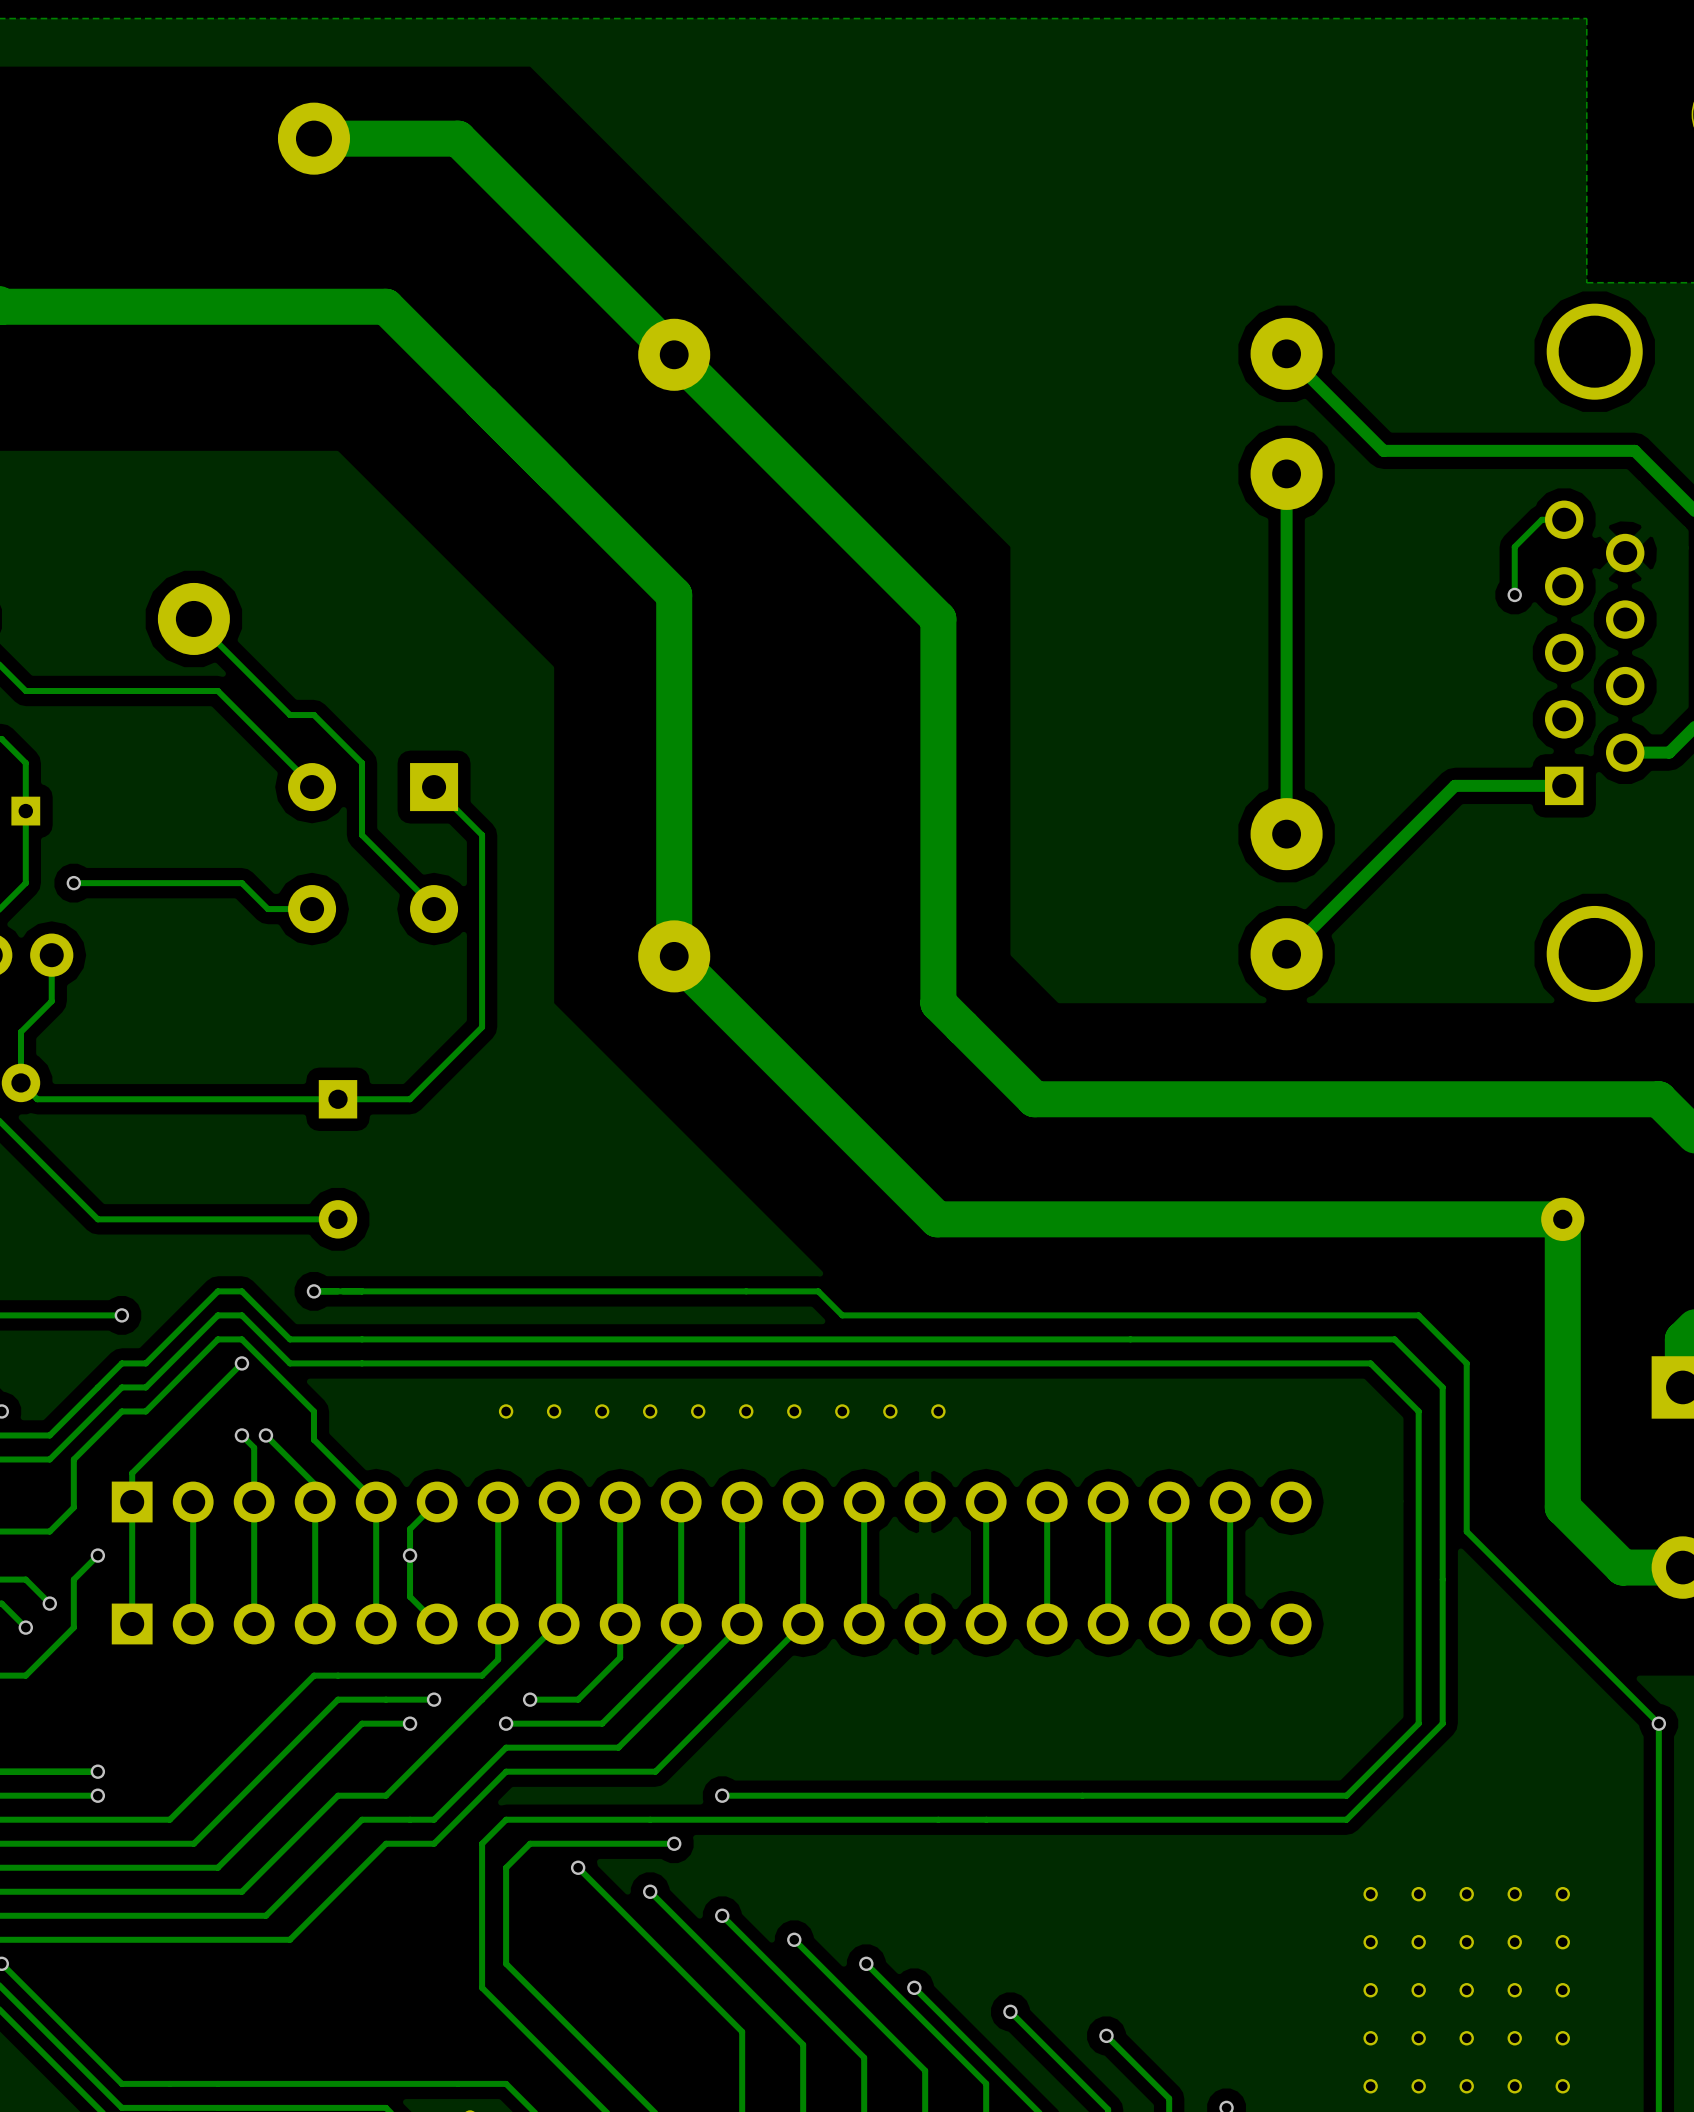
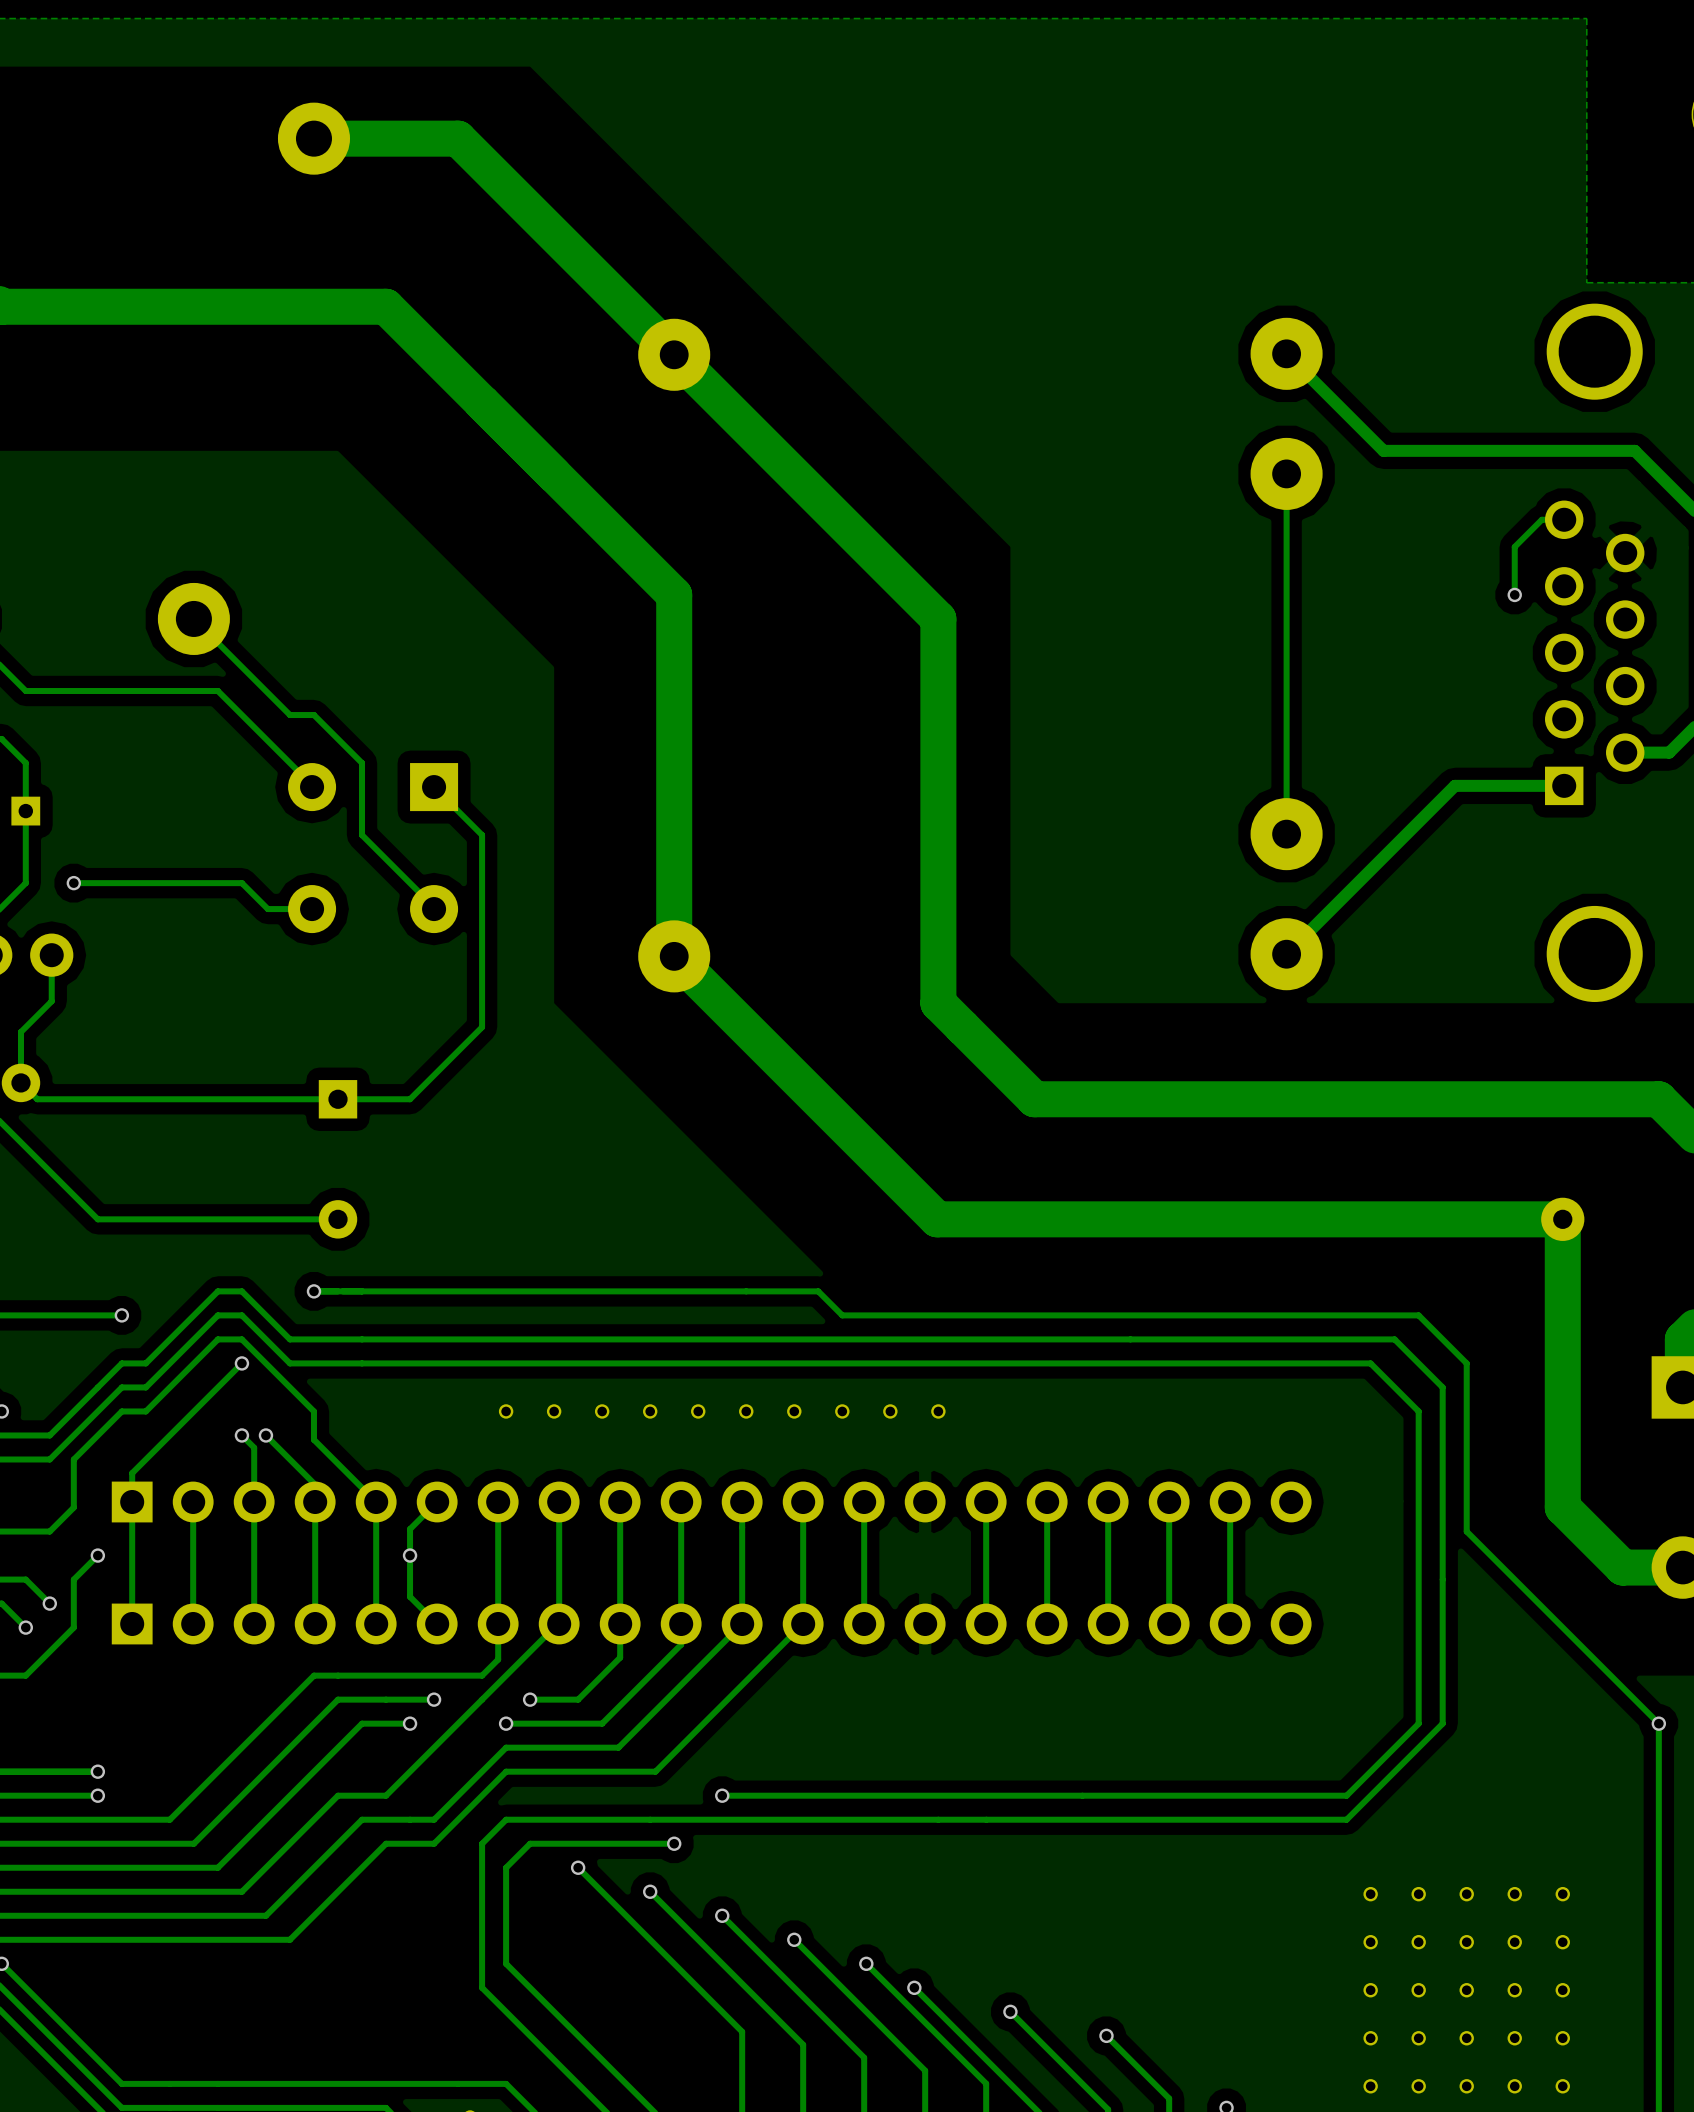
track width: thick (1286, 473) (1286, 834) -> thin (1286, 473) (1286, 834)

